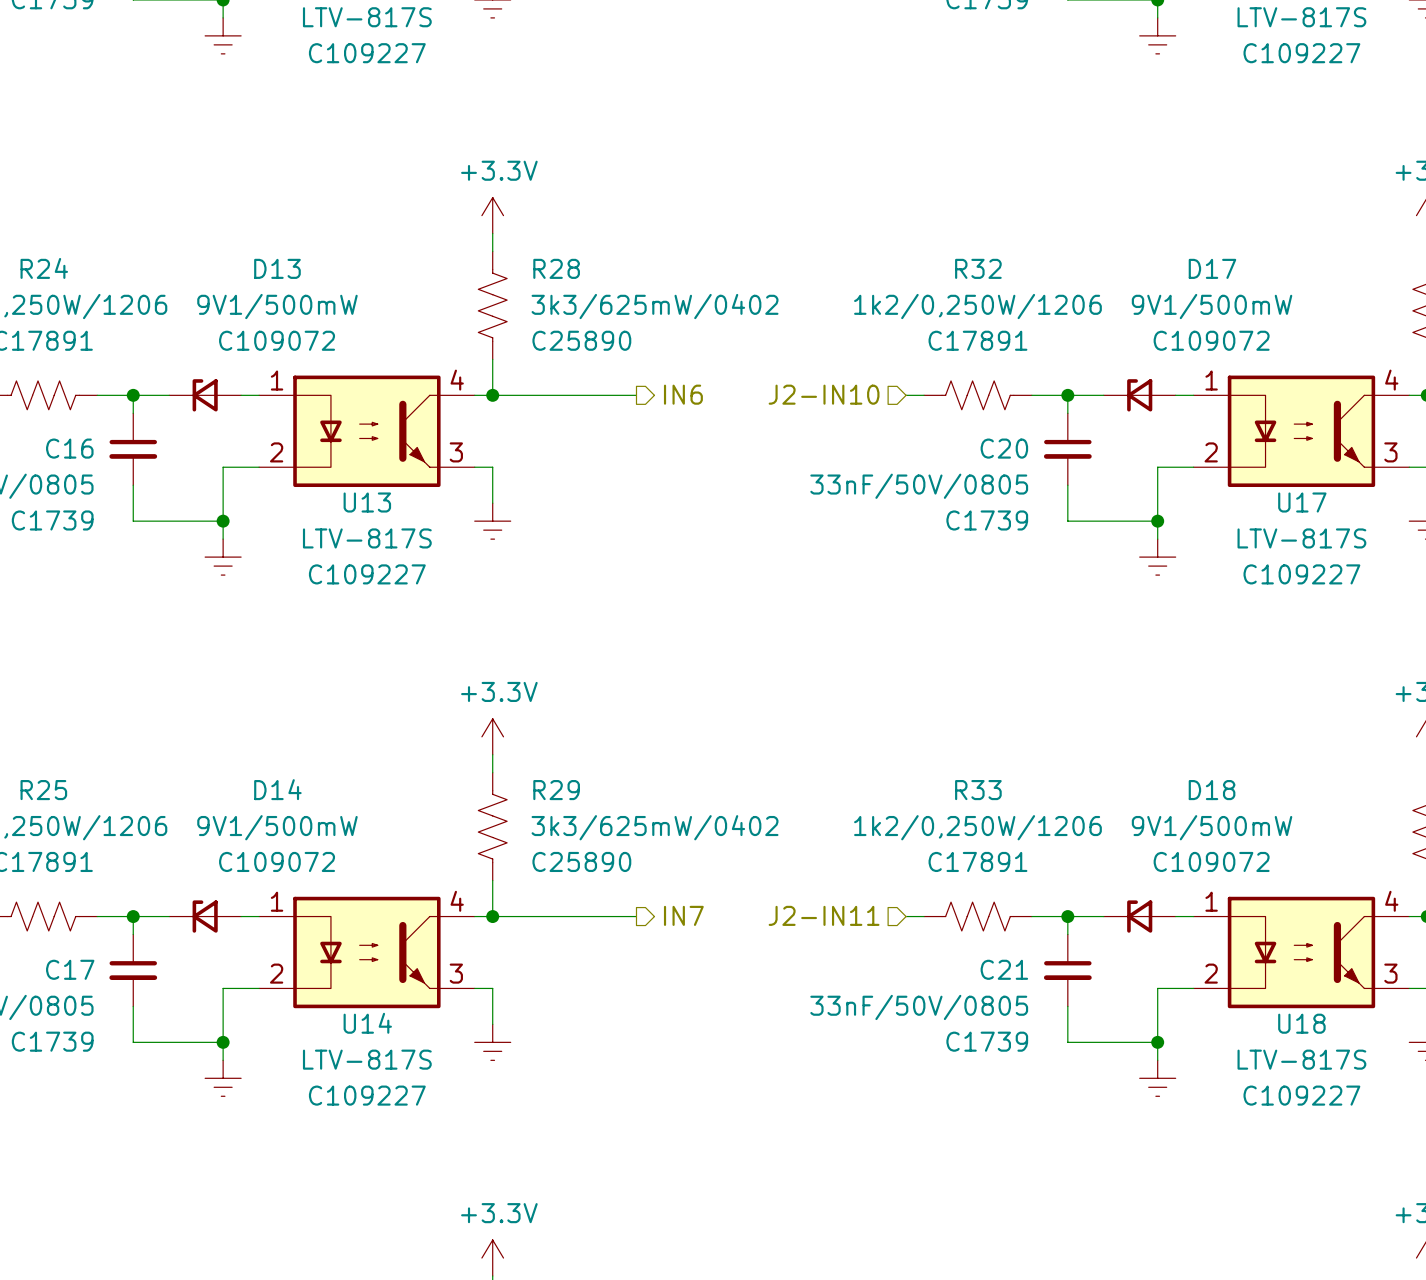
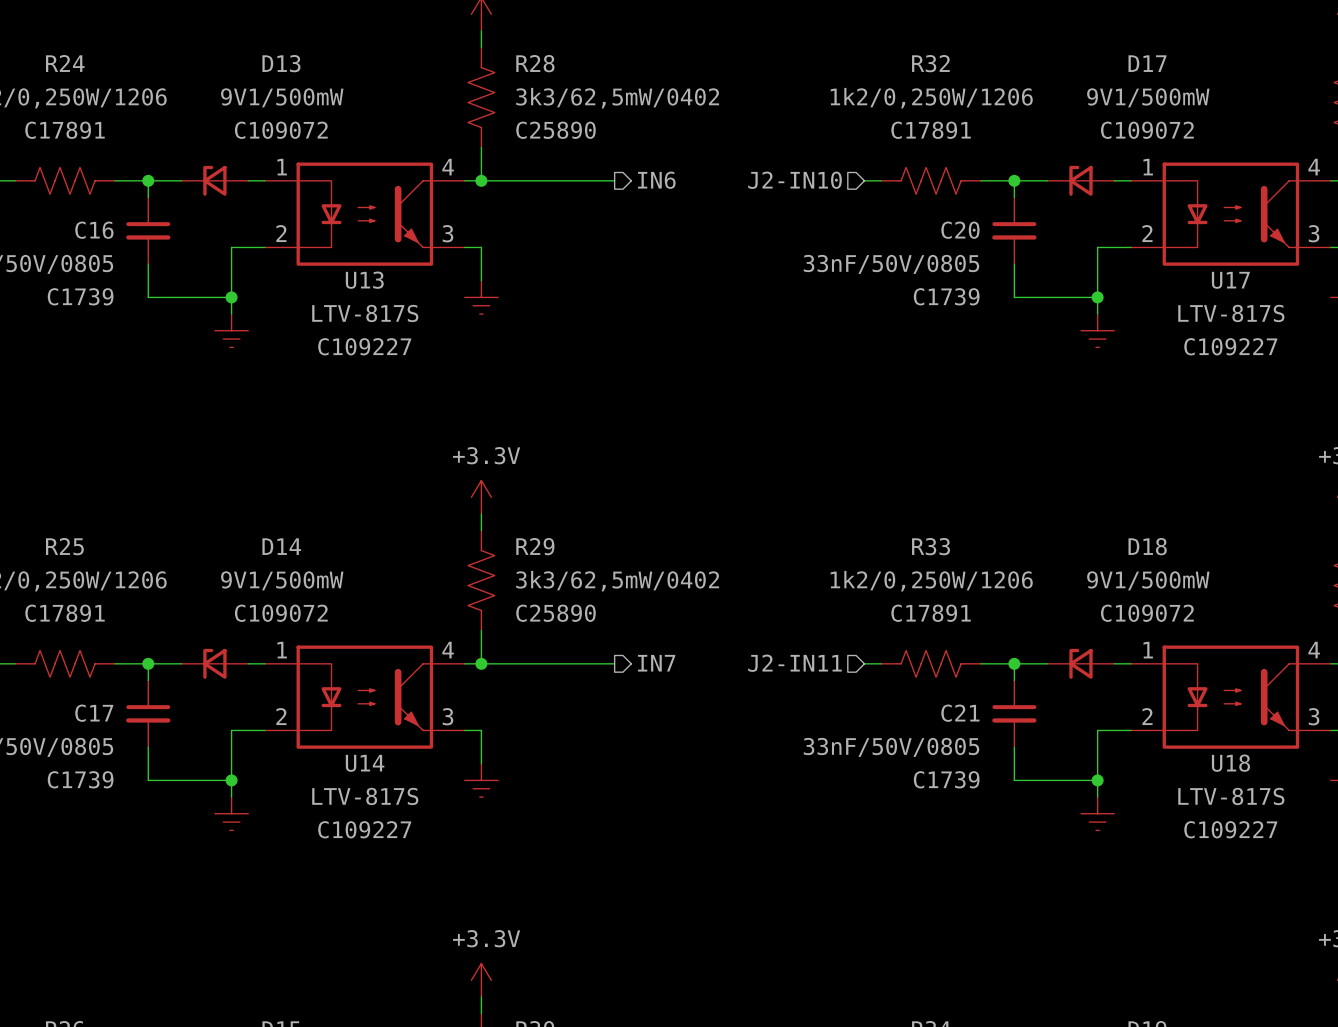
R28 value: 3k3/625mW/0402 (655, 306) -> 3k3/62,5mW/0402 (617, 98)
R29 value: 3k3/625mW/0402 (655, 827) -> 3k3/62,5mW/0402 (617, 581)

